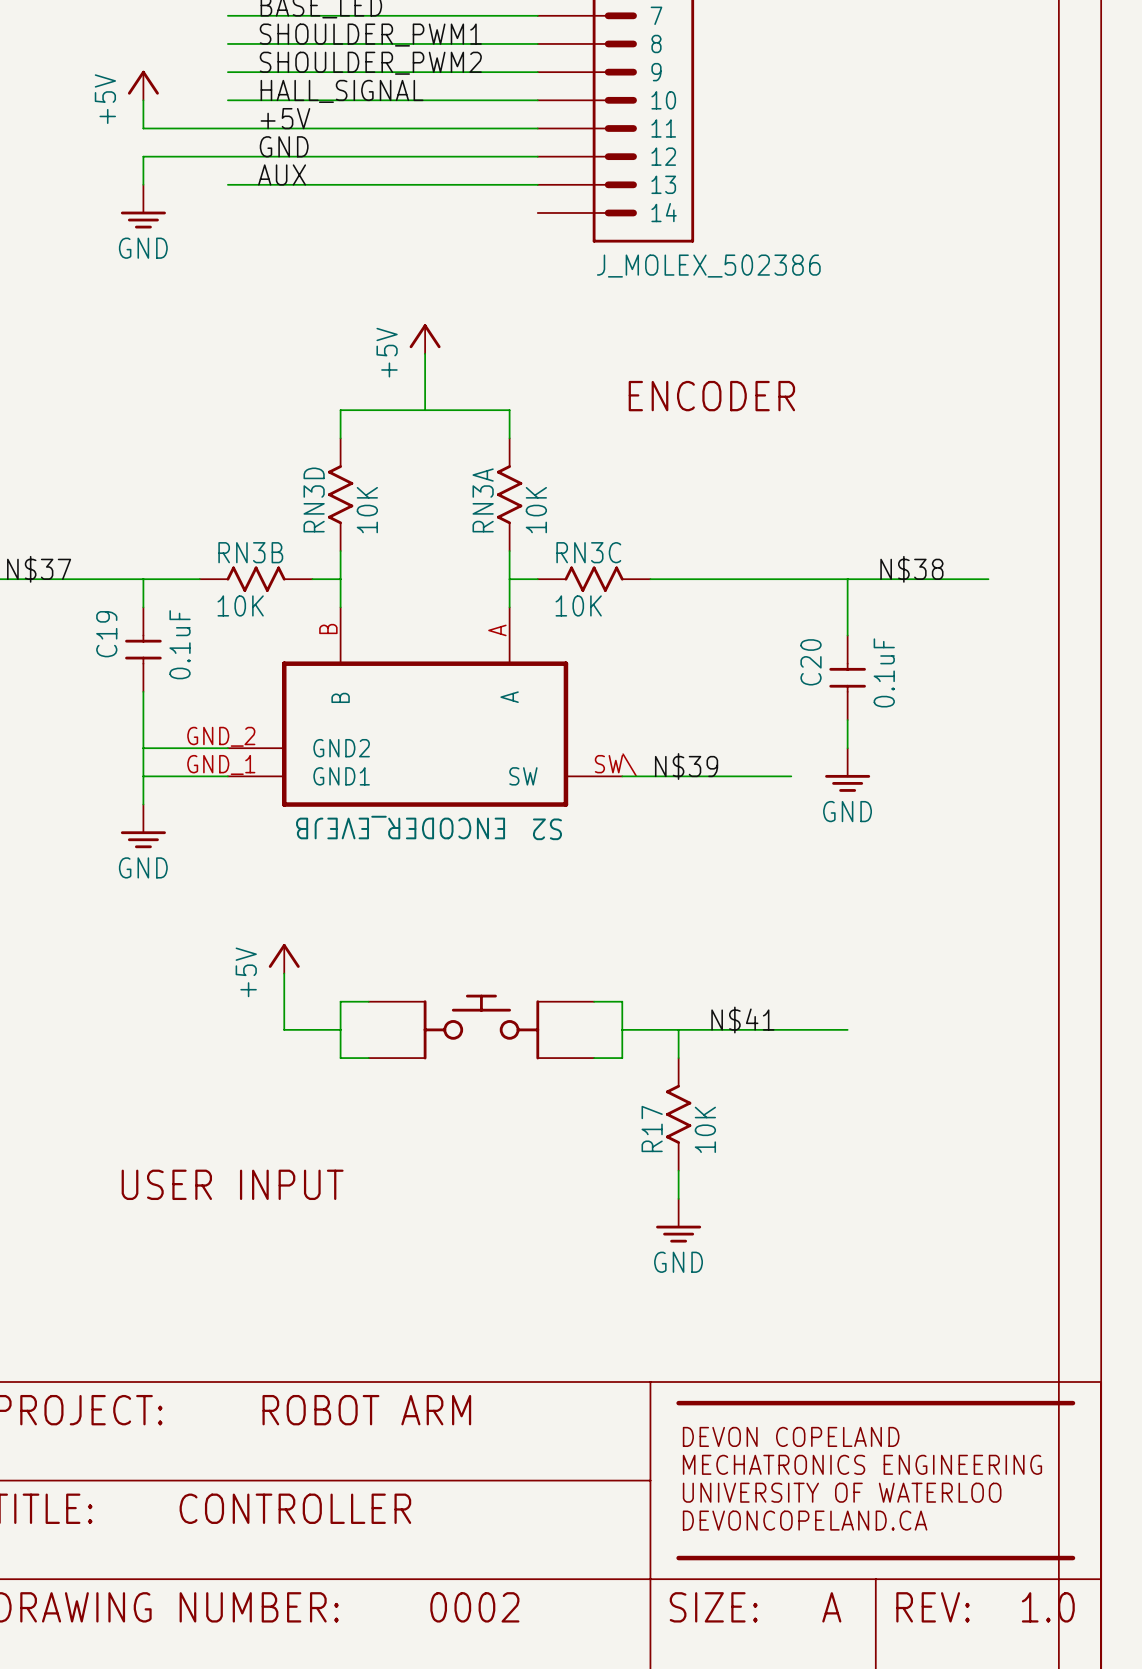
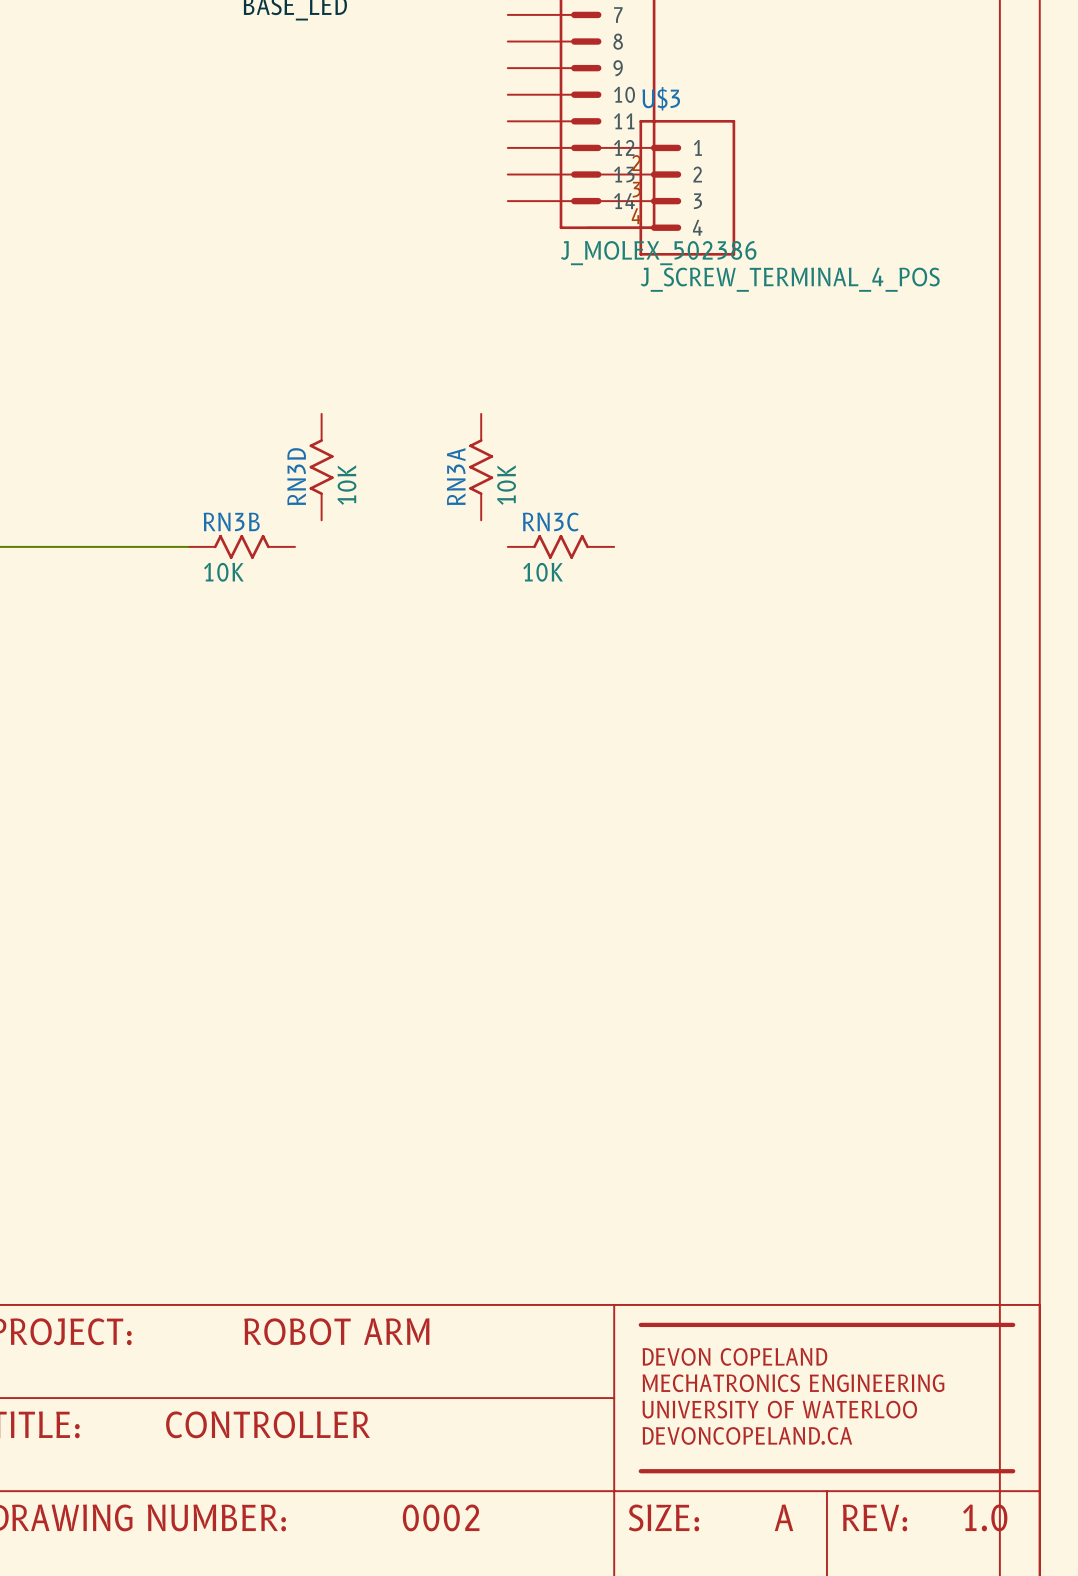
wire: (227, 15) (537, 15) -> none
label: SHOULDER_PWM1 (370, 35) -> none
wire: (227, 43) (537, 43) -> none
label: SHOULDER_PWM2 (370, 63) -> none
wire: (227, 72) (537, 72) -> none
power symbol: +5V (143, 85) -> none
label: HALL_SIGNAL (342, 91) -> none
wire: (143, 100) (143, 128) (537, 128) -> none
wire: (227, 100) (537, 100) -> none
label: +5V (285, 118) -> none
label: GND (284, 146) -> none
wire: (537, 156) (143, 156) (143, 184) -> none
label: AUX (282, 174) -> none
wire: (227, 184) (537, 184) -> none
U$3: none -> J_SCREW_TERMINAL_4_POS (661, 187)
power symbol: GND (143, 206) -> none
power symbol: +5V (425, 339) -> none
wire: (425, 353) (425, 410) -> none
text: ENCODER (711, 396) -> none
wire: (340, 438) (340, 410) (509, 410) (509, 438) -> none
wire: (340, 551) (340, 607) -> none
wire: (509, 551) (509, 607) -> none
label: N$37 (39, 569) -> none
label: N$38 (911, 569) -> none
wire: (143, 579) (143, 607) -> none
wire: (312, 579) (340, 579) -> none
wire: (509, 579) (537, 579) -> none
wire: (650, 579) (988, 579) -> none
wire: (847, 579) (847, 635) -> none
C19: 0.1uF (143, 649) -> none
C20: 0.1uF (847, 677) -> none
wire: (143, 691) (143, 804) -> none
S2: ENCODER_EVEJB (425, 707) -> none
wire: (847, 720) (847, 748) -> none
wire: (143, 748) (227, 748) -> none
label: N$39 (686, 766) -> none
power symbol: GND (847, 770) -> none
wire: (143, 776) (227, 776) -> none
wire: (622, 776) (791, 776) -> none
power symbol: GND (143, 826) -> none
power symbol: +5V (284, 958) -> none
wire: (284, 973) (284, 1029) (340, 1029) -> none
wire: (368, 1001) (340, 1001) (340, 1058) (368, 1058) -> none
wire: (594, 1001) (622, 1001) (622, 1058) (594, 1058) -> none
label: N$41 (742, 1020) -> none
part: (481, 1027) -> none
wire: (622, 1029) (847, 1029) -> none
wire: (678, 1029) (678, 1058) -> none
R17: 10K (678, 1114) -> none
wire: (678, 1170) (678, 1198) -> none
text: USER INPUT (232, 1184) -> none
power symbol: GND (678, 1220) -> none

